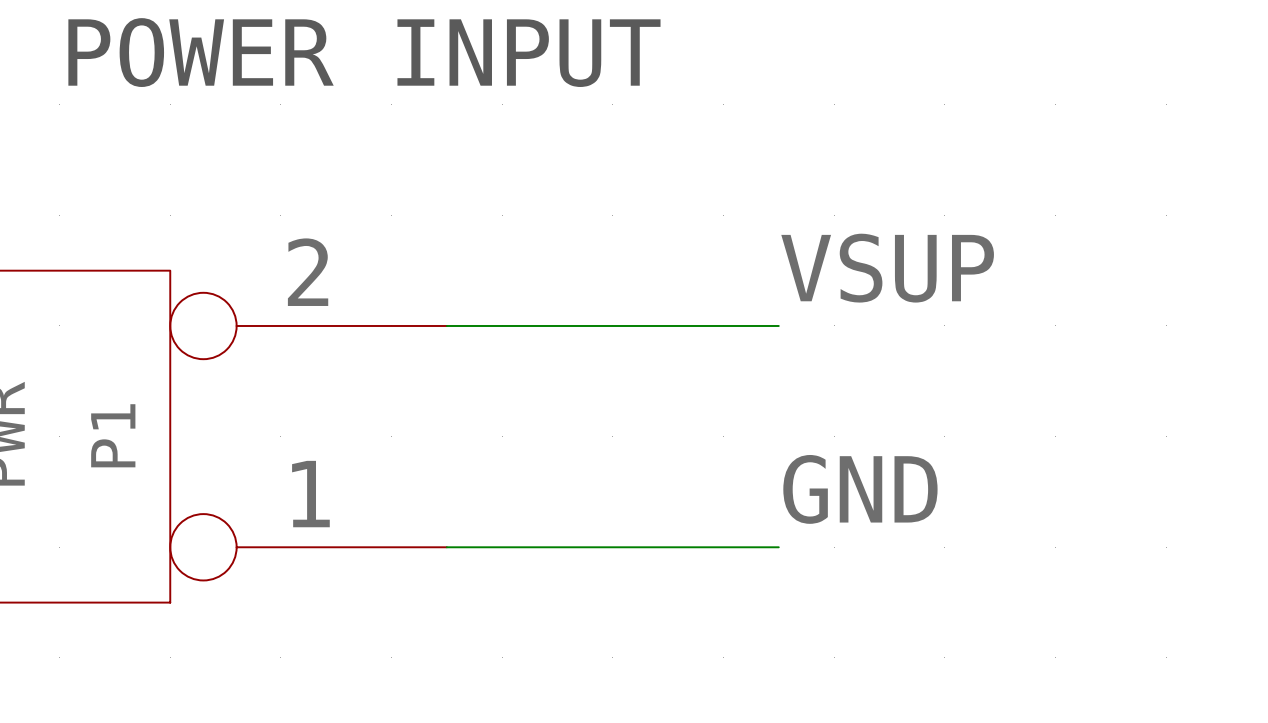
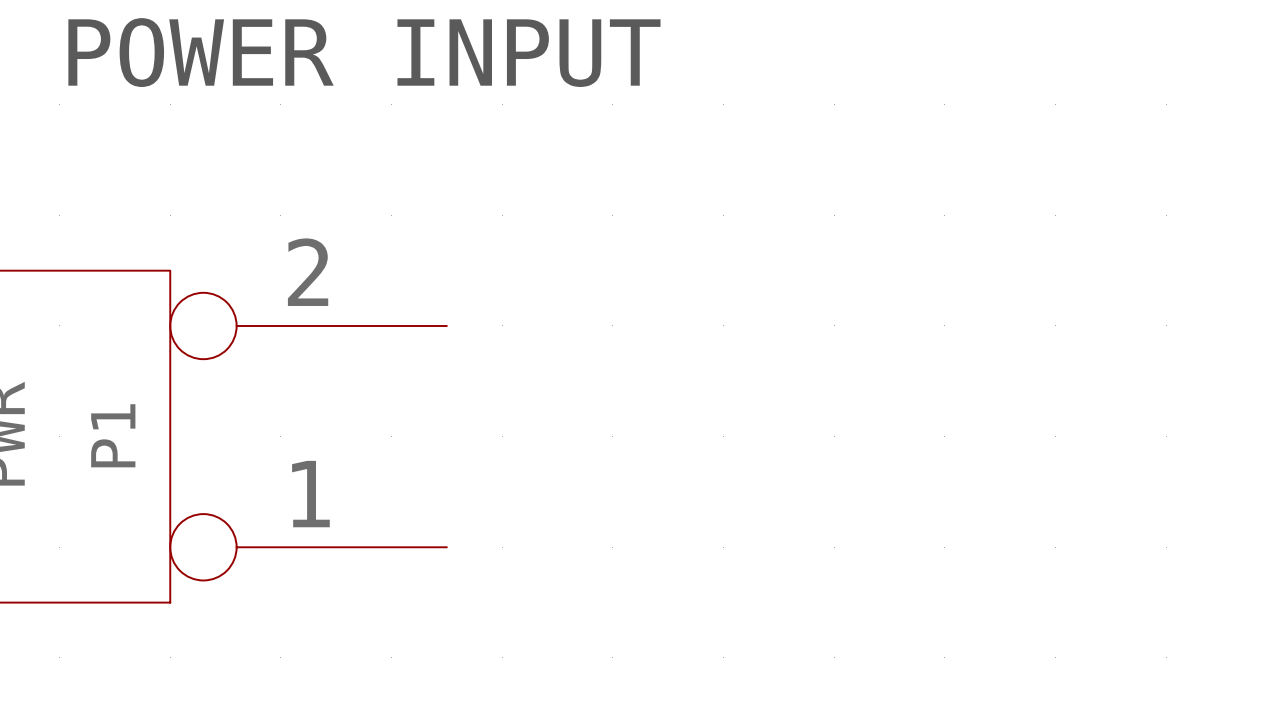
label: VSUP (887, 268) -> none
wire: (446, 325) (778, 325) -> none
label: GND (860, 489) -> none
wire: (446, 547) (778, 547) -> none

